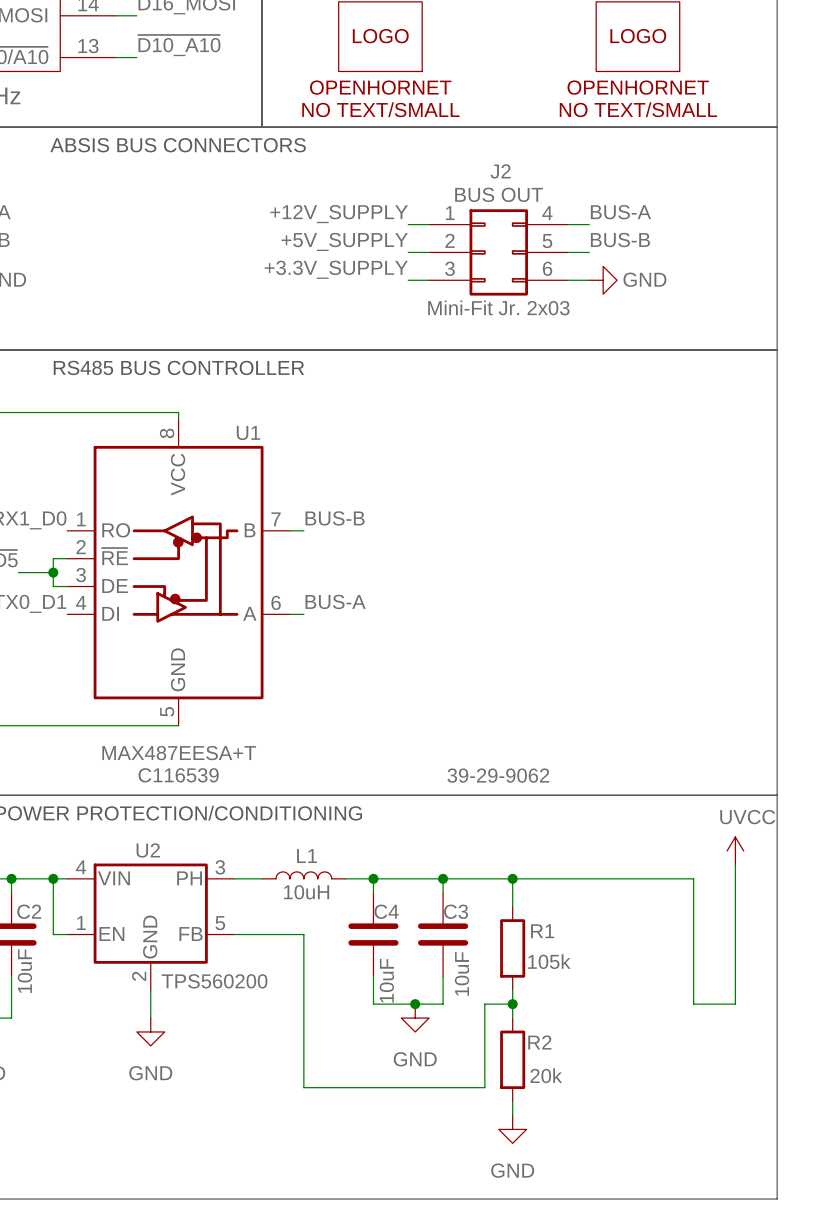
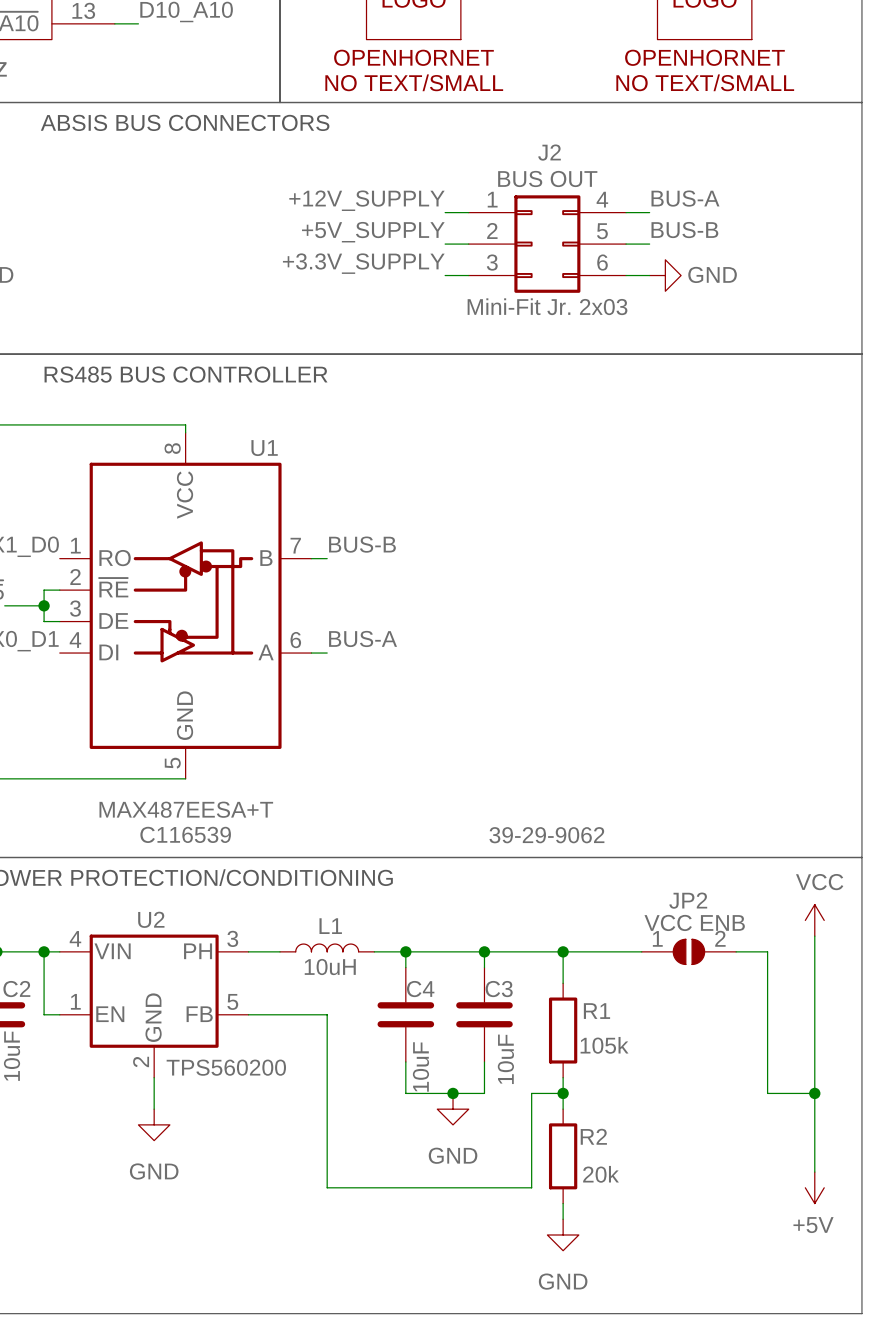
power symbol: UVCC (735, 851) -> VCC (814, 920)
JP2: none -> VCC ENB (688, 951)
wire: none -> (814, 1093) (814, 1172)
junction: none -> (814, 1093)
power symbol: none -> +5V (814, 1187)

